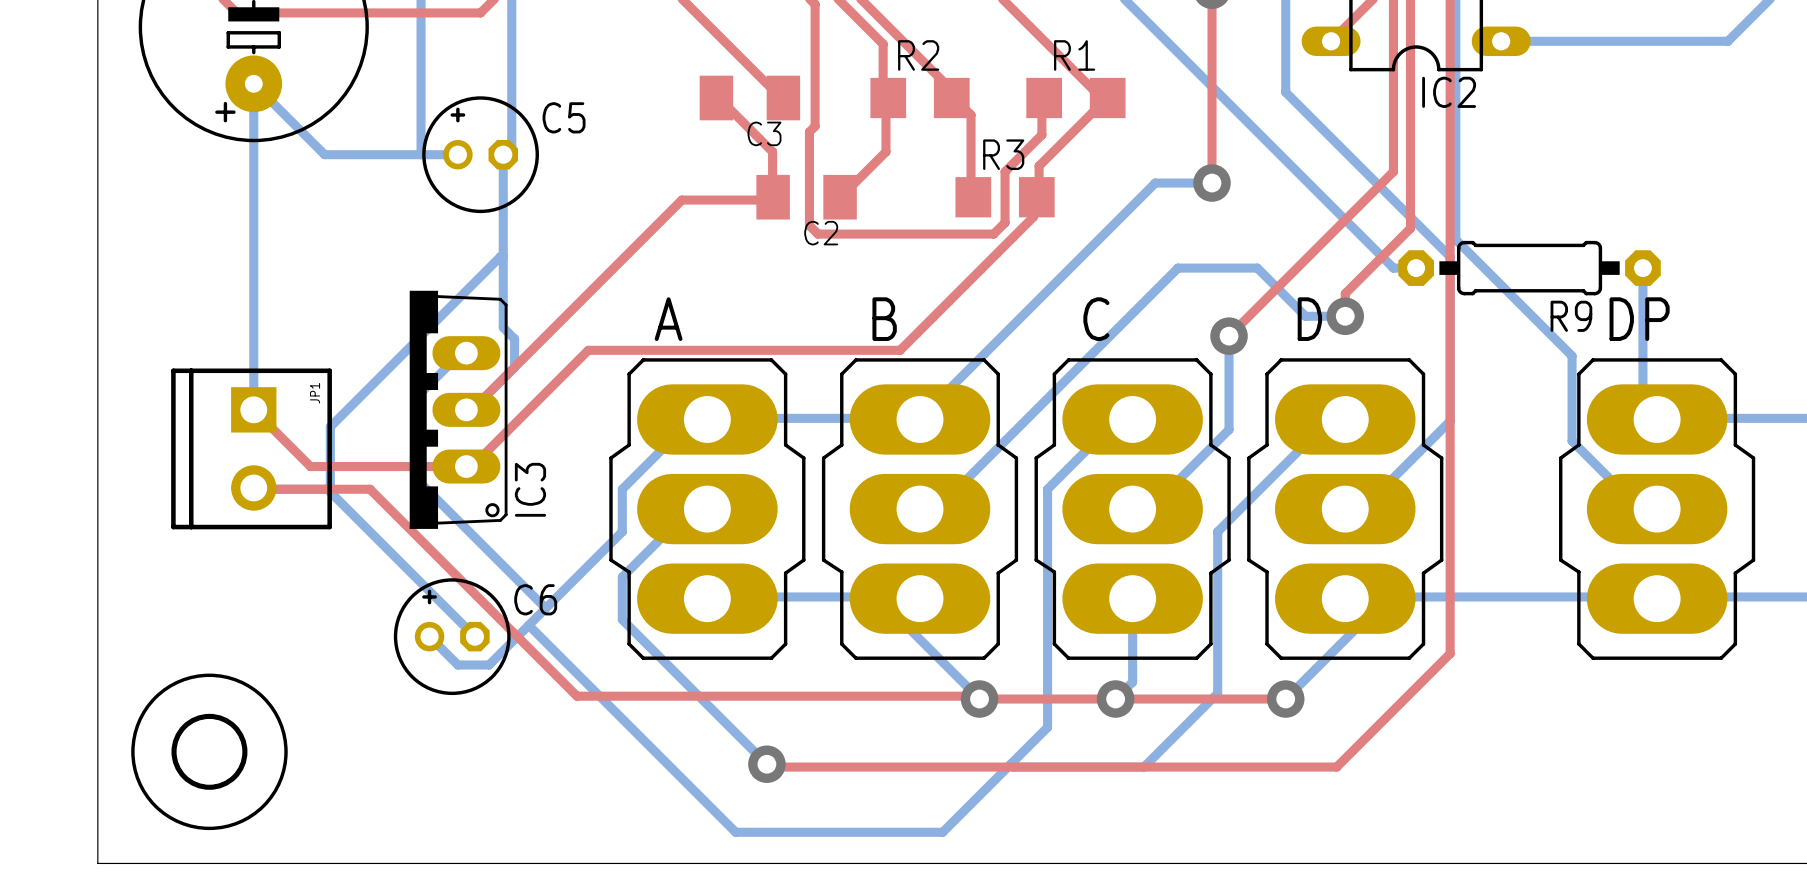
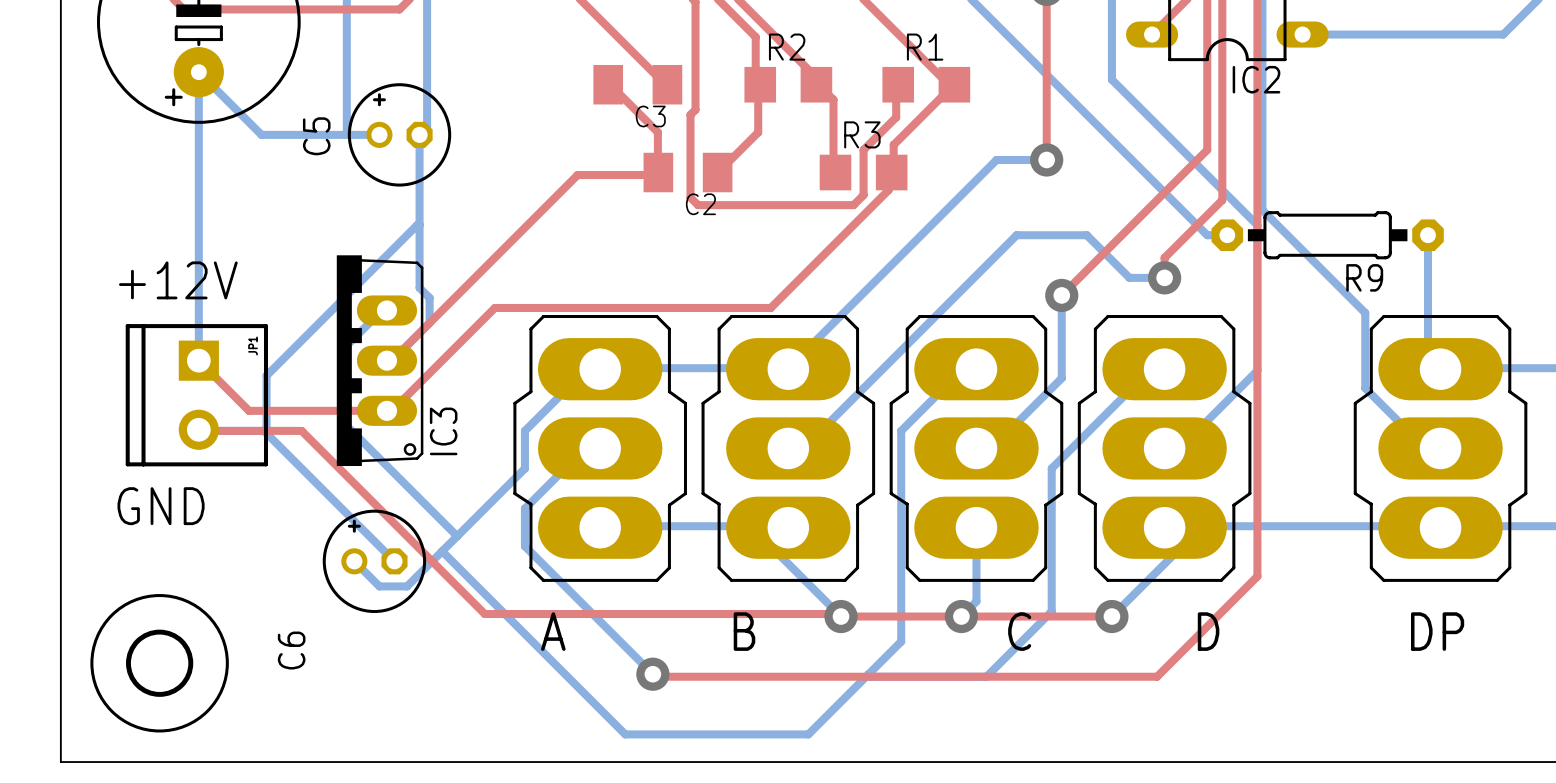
C5 name rotation: 0° (564, 117) -> 90° counterclockwise (316, 136)
C5 name position: C5 (564, 117) -> C5 (316, 136)
text: none -> +12V (178, 280)
A name position: A (668, 319) -> A (553, 631)
B name position: B (884, 319) -> B (744, 631)
C name position: C (1096, 319) -> C (1019, 631)
D name position: D (1309, 319) -> D (1208, 631)
DP name position: DP (1639, 319) -> DP (1437, 631)
text: none -> GND (161, 506)
C6 name rotation: 0° (535, 599) -> 90° counterclockwise (291, 650)
C6 name position: C6 (535, 599) -> C6 (291, 650)

